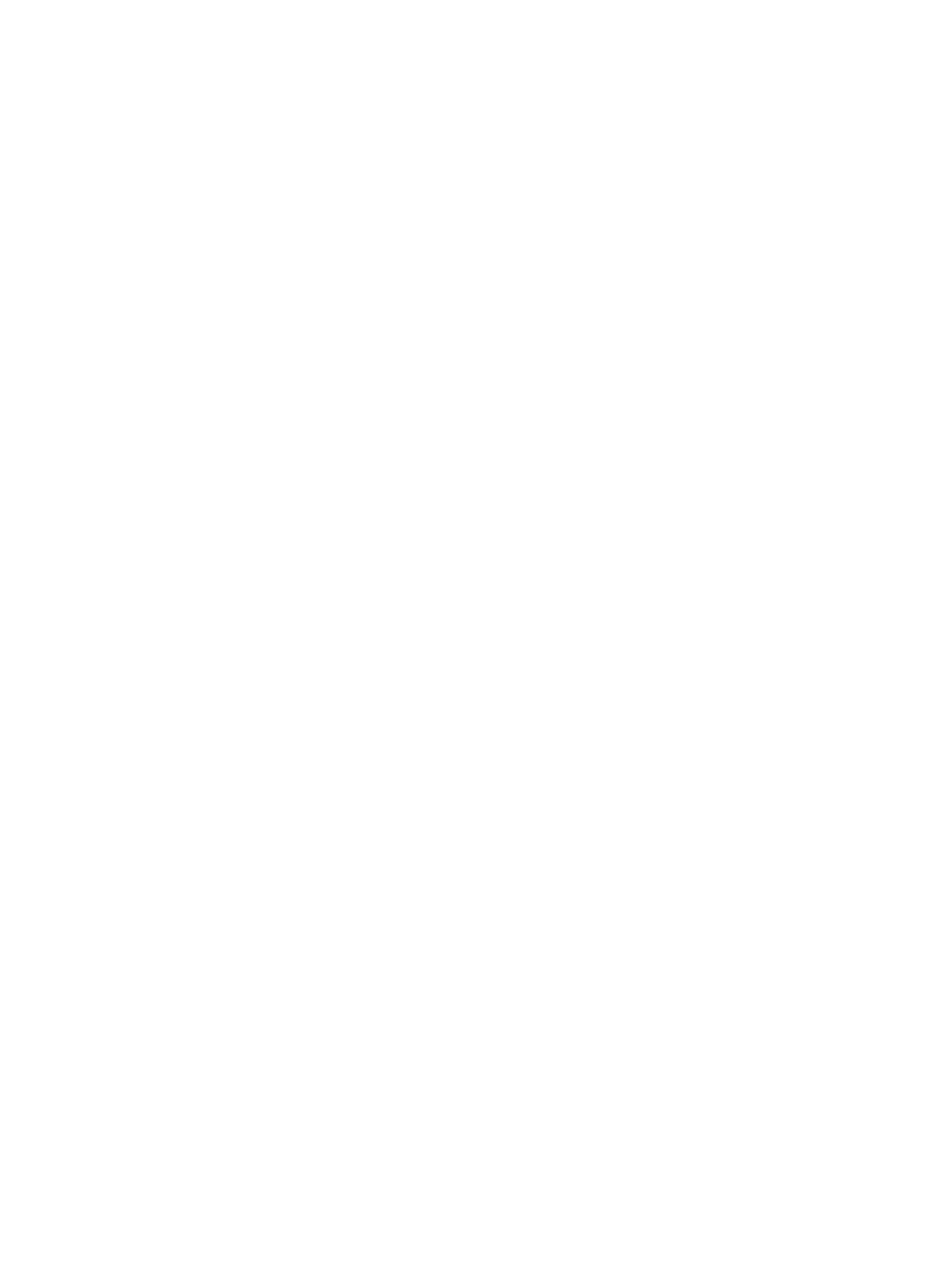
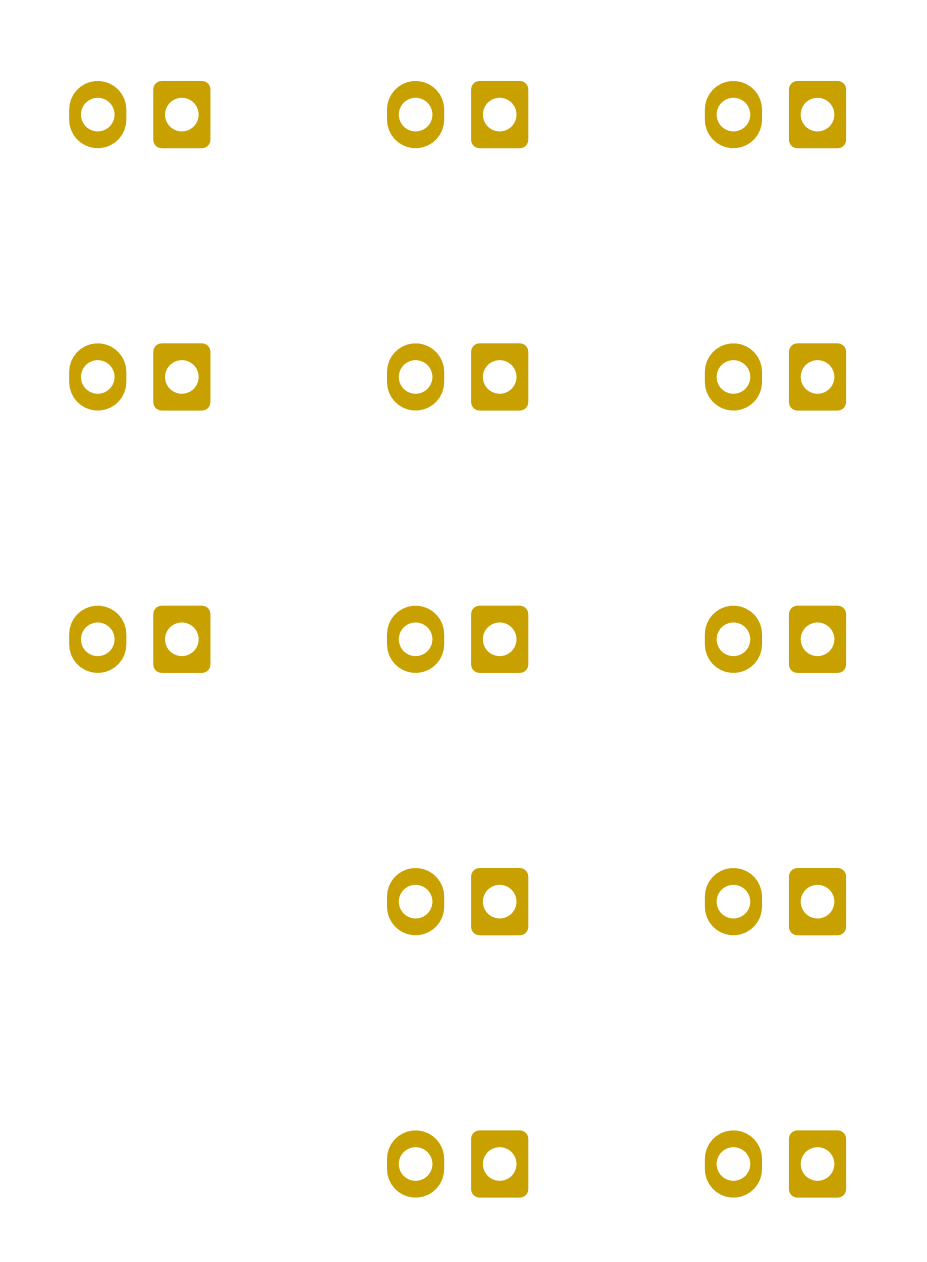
part: none -> (139, 114)
part: none -> (457, 114)
part: none -> (775, 114)
part: none -> (139, 376)
part: none -> (457, 376)
part: none -> (775, 376)
part: none -> (139, 639)
part: none -> (457, 639)
part: none -> (775, 639)
part: none -> (457, 901)
part: none -> (775, 901)
part: none -> (457, 1164)
part: none -> (775, 1164)

